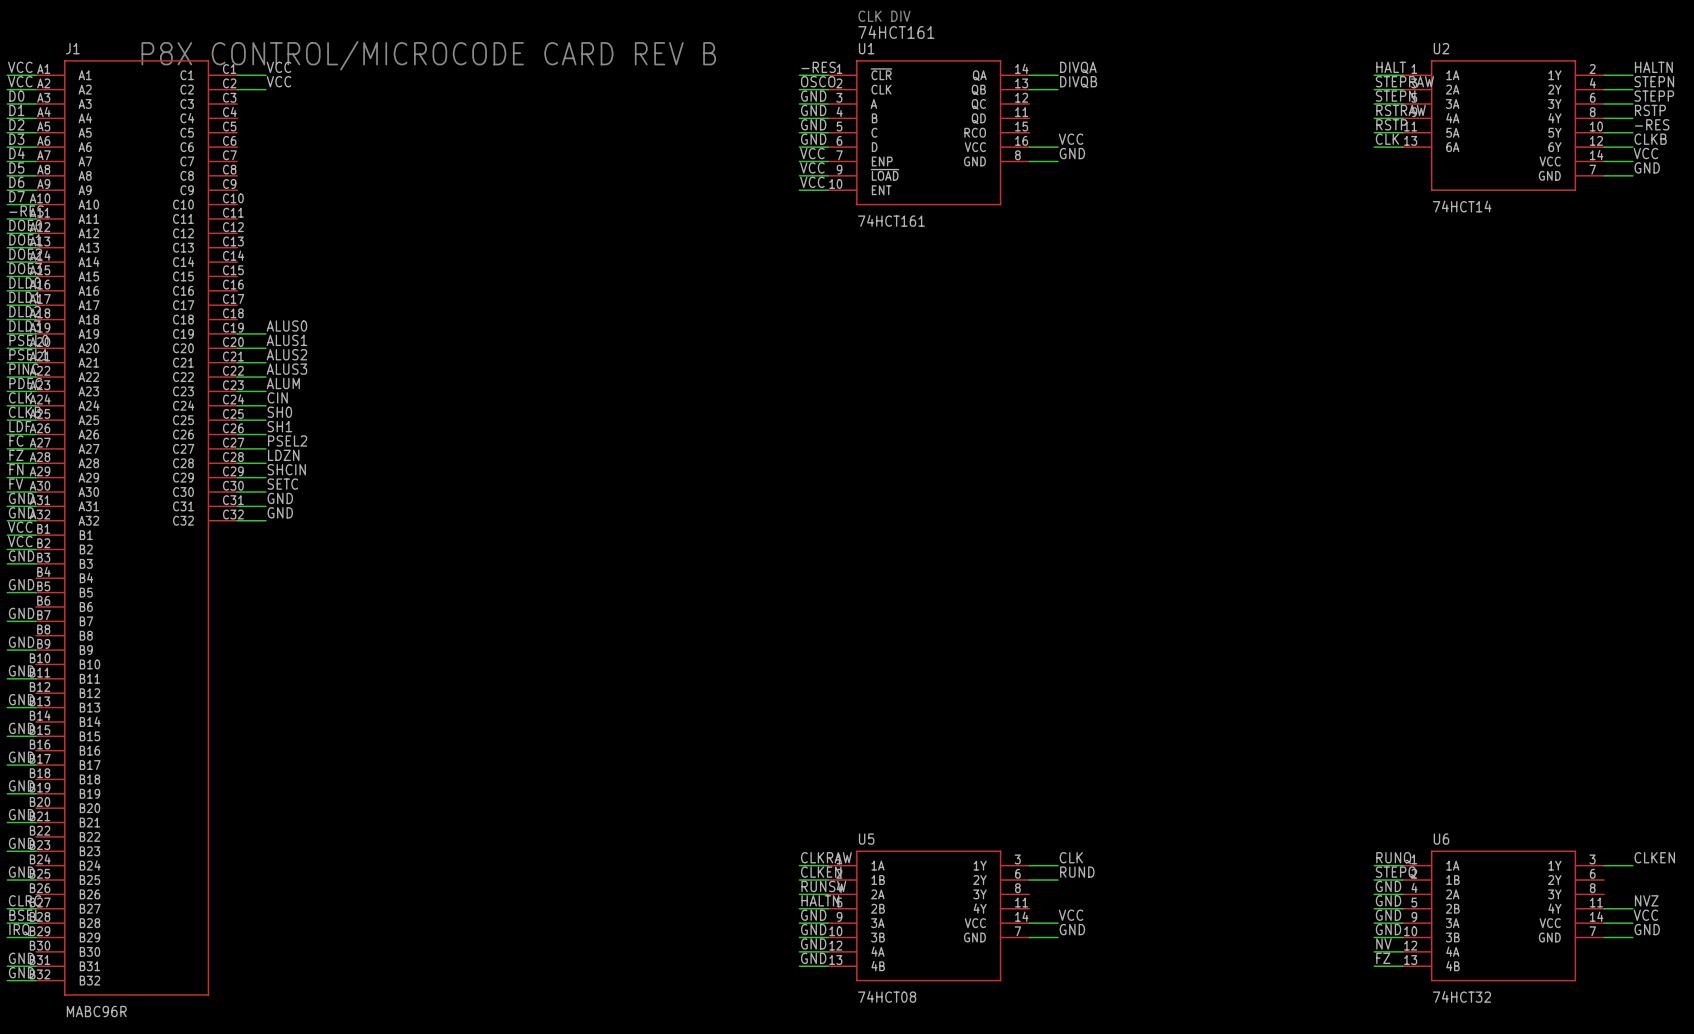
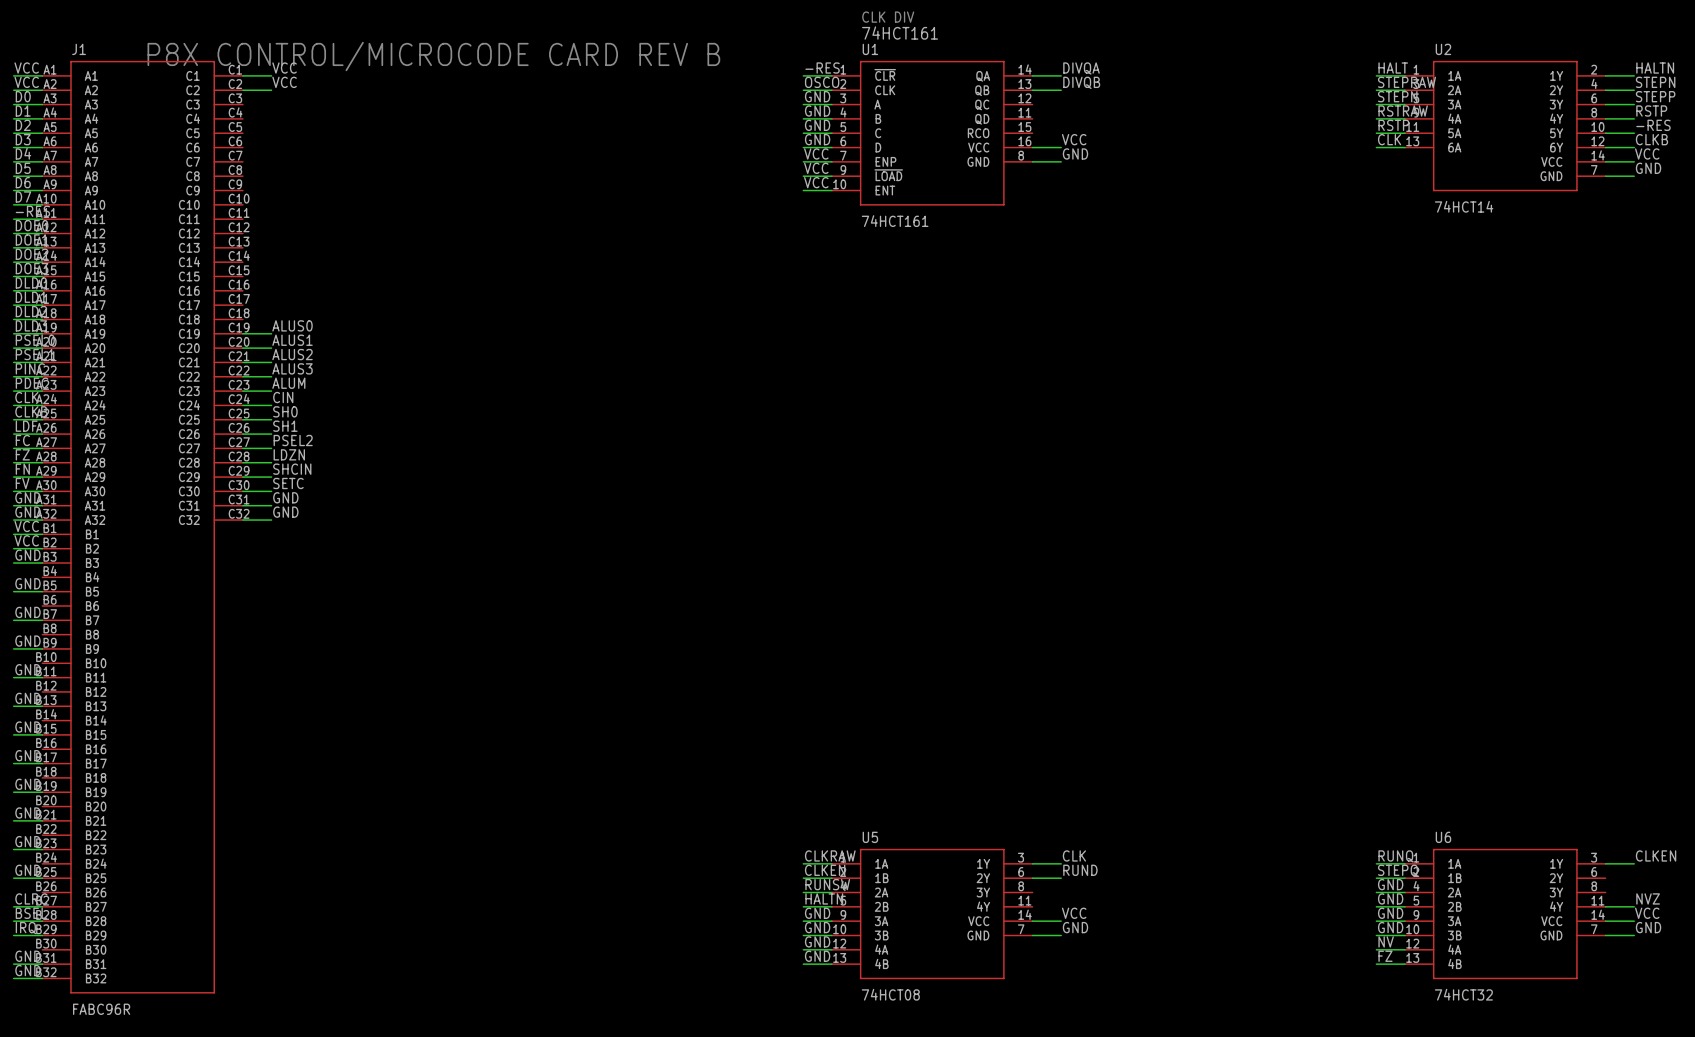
J1 value: MABC96R (96, 1011) -> FABC96R (101, 1009)

